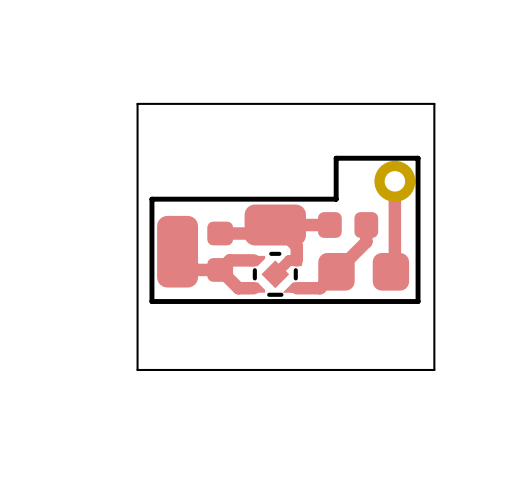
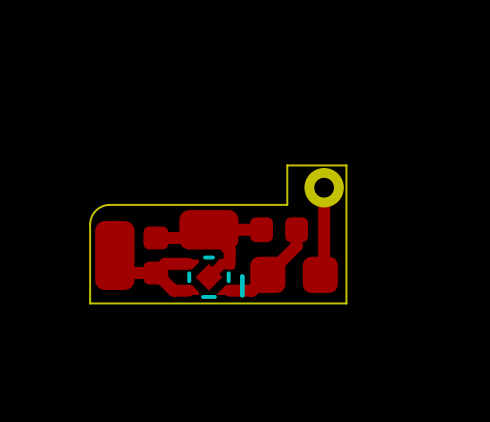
board edge: (137, 103) (137, 369) (434, 369) (434, 103) (137, 103) -> none
line: (336, 158) (336, 199) (151, 199) (151, 301) (418, 301) (418, 158) (336, 158) -> none
board edge: none -> (287, 165) (287, 204) (109, 204) (97, 208) (92, 214) (90, 222) (90, 303) (346, 303) (346, 165) (287, 165)
line: none -> (242, 276) (242, 295)

